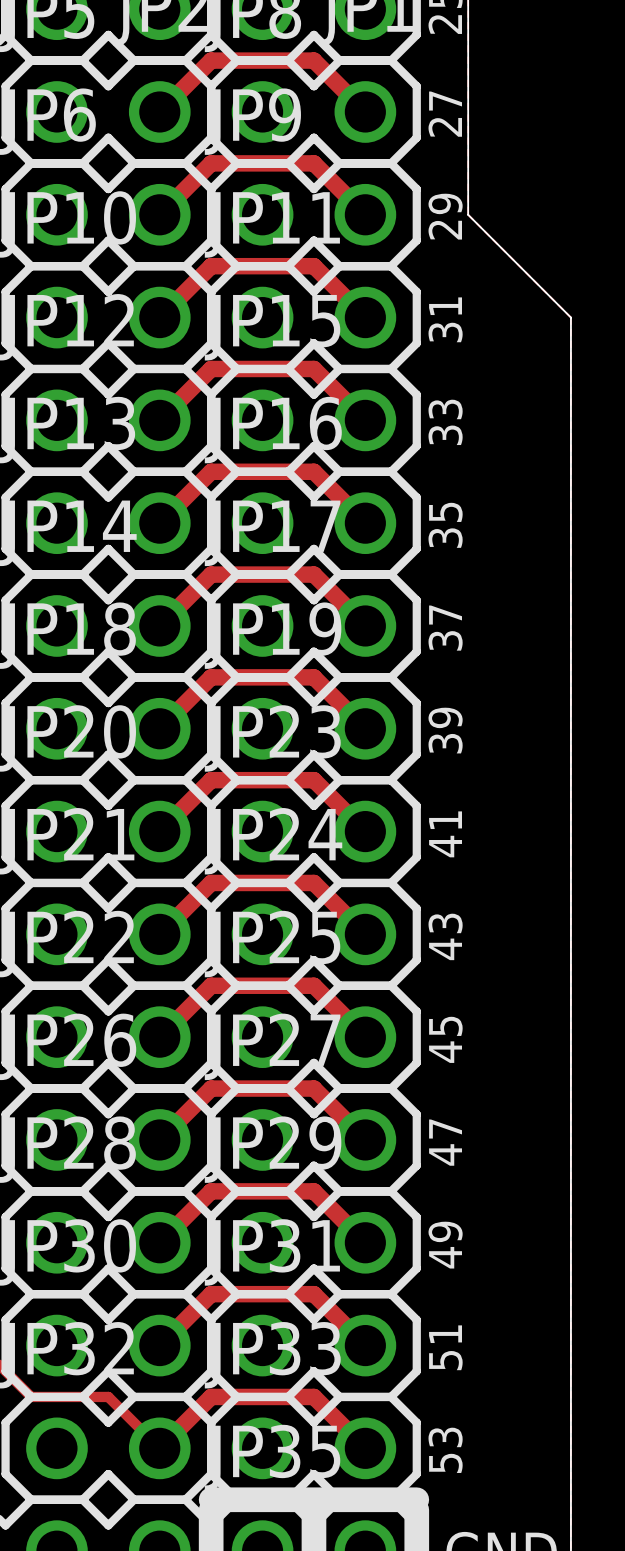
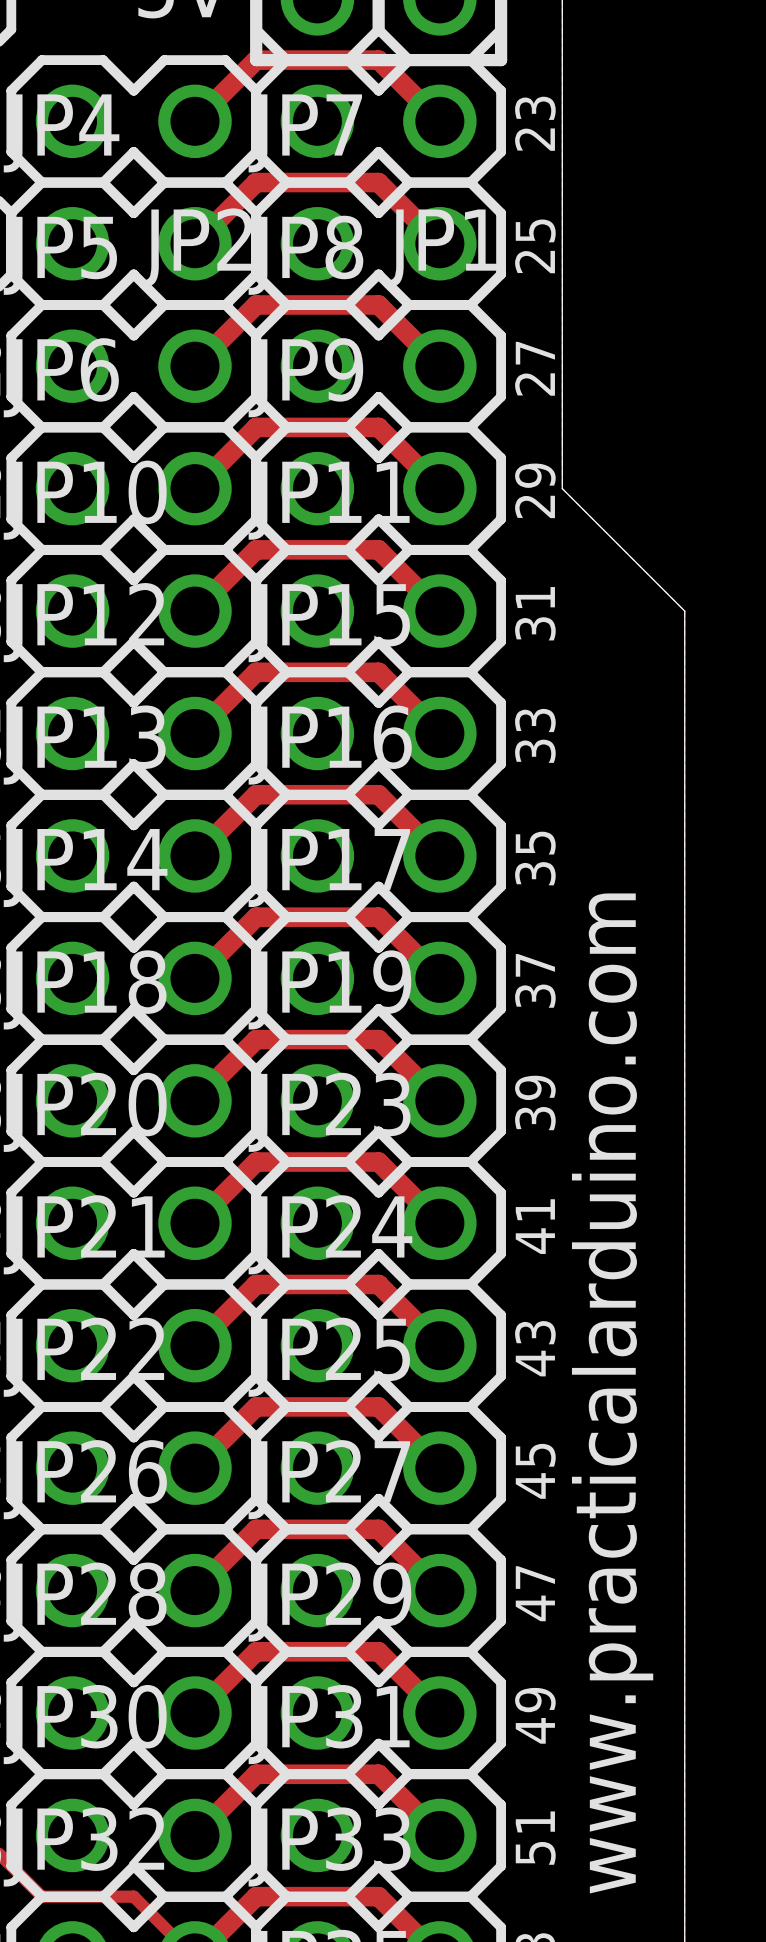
text: none -> www.practicalarduino.com (612, 1393)

